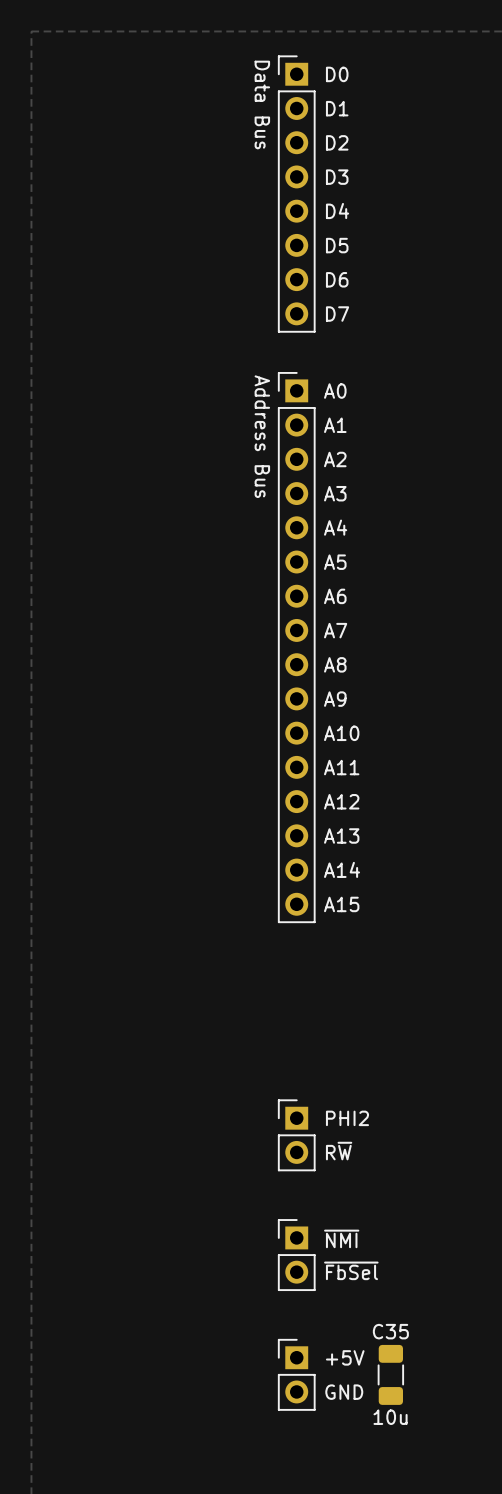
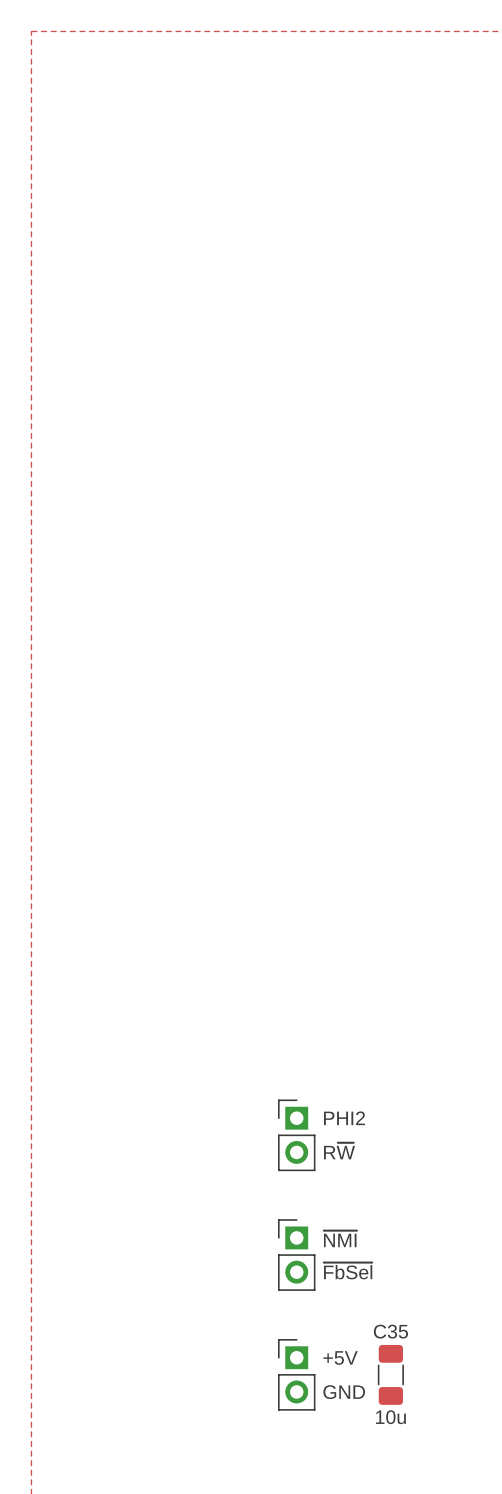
text: D0 (337, 74) -> none
text: Data Bus (262, 104) -> none
text: D1 (337, 108) -> none
text: D2 (337, 142) -> none
text: D3 (337, 177) -> none
part: (296, 194) -> none
text: D4 (337, 211) -> none
text: D5 (337, 245) -> none
text: D6 (337, 279) -> none
text: D7 (337, 314) -> none
text: A0 (335, 391) -> none
text: A1 (335, 425) -> none
text: Address Bus (262, 436) -> none
text: A2 (335, 459) -> none
text: A3 (335, 493) -> none
text: A4 (335, 527) -> none
text: A5 (335, 562) -> none
text: A6 (335, 596) -> none
text: A7 (335, 630) -> none
part: (296, 647) -> none
text: A8 (335, 664) -> none
text: A9 (335, 699) -> none
text: A10 (341, 733) -> none
text: A11 (341, 767) -> none
text: A12 (341, 801) -> none
text: A13 (341, 836) -> none
text: A14 (342, 869) -> none
text: A15 (341, 904) -> none

